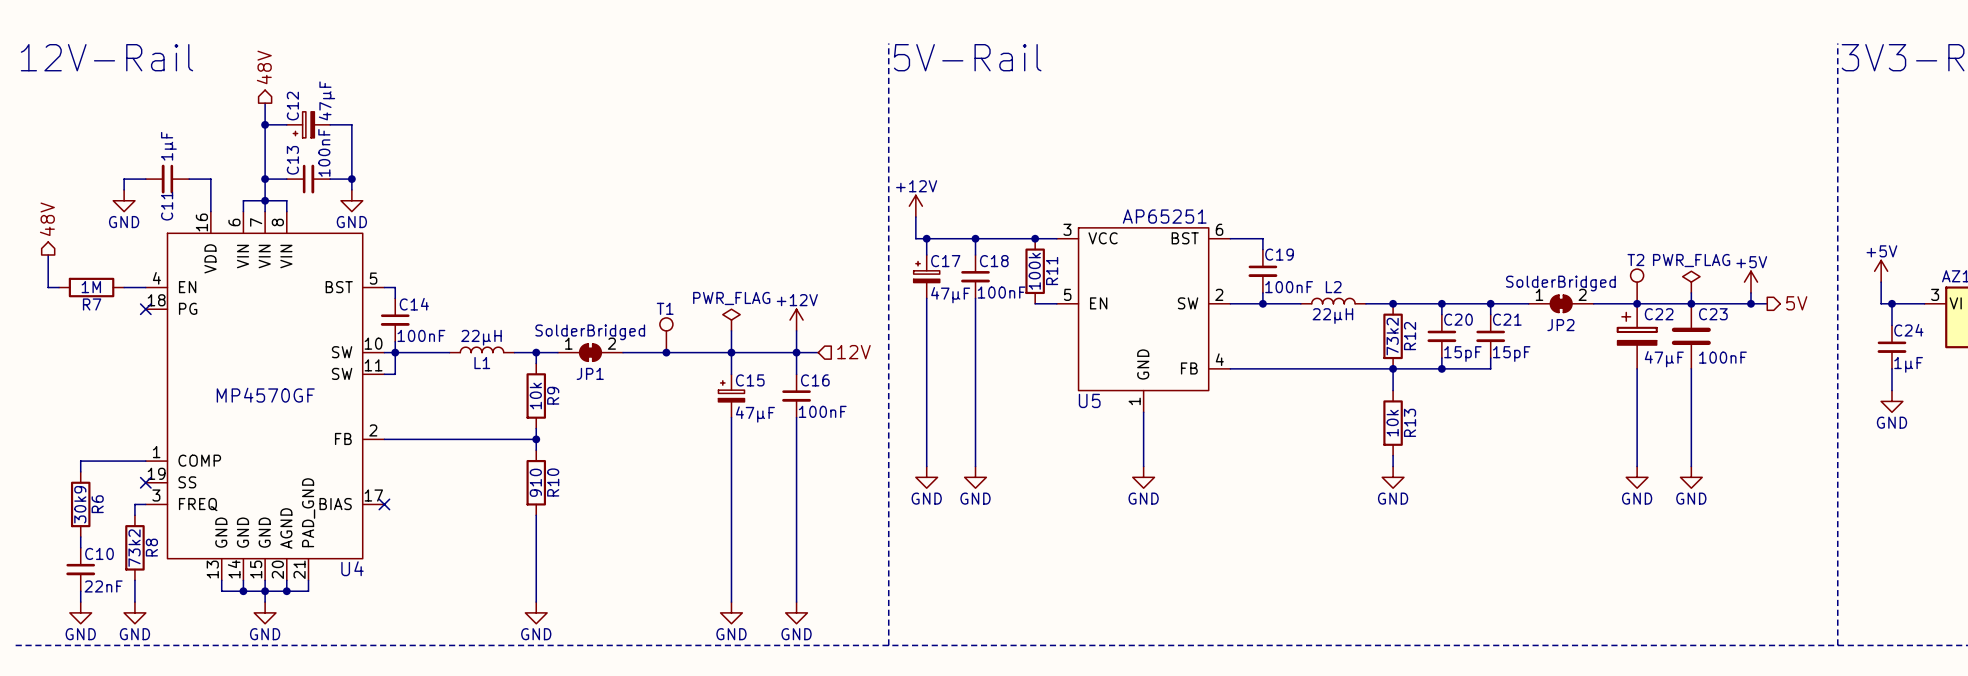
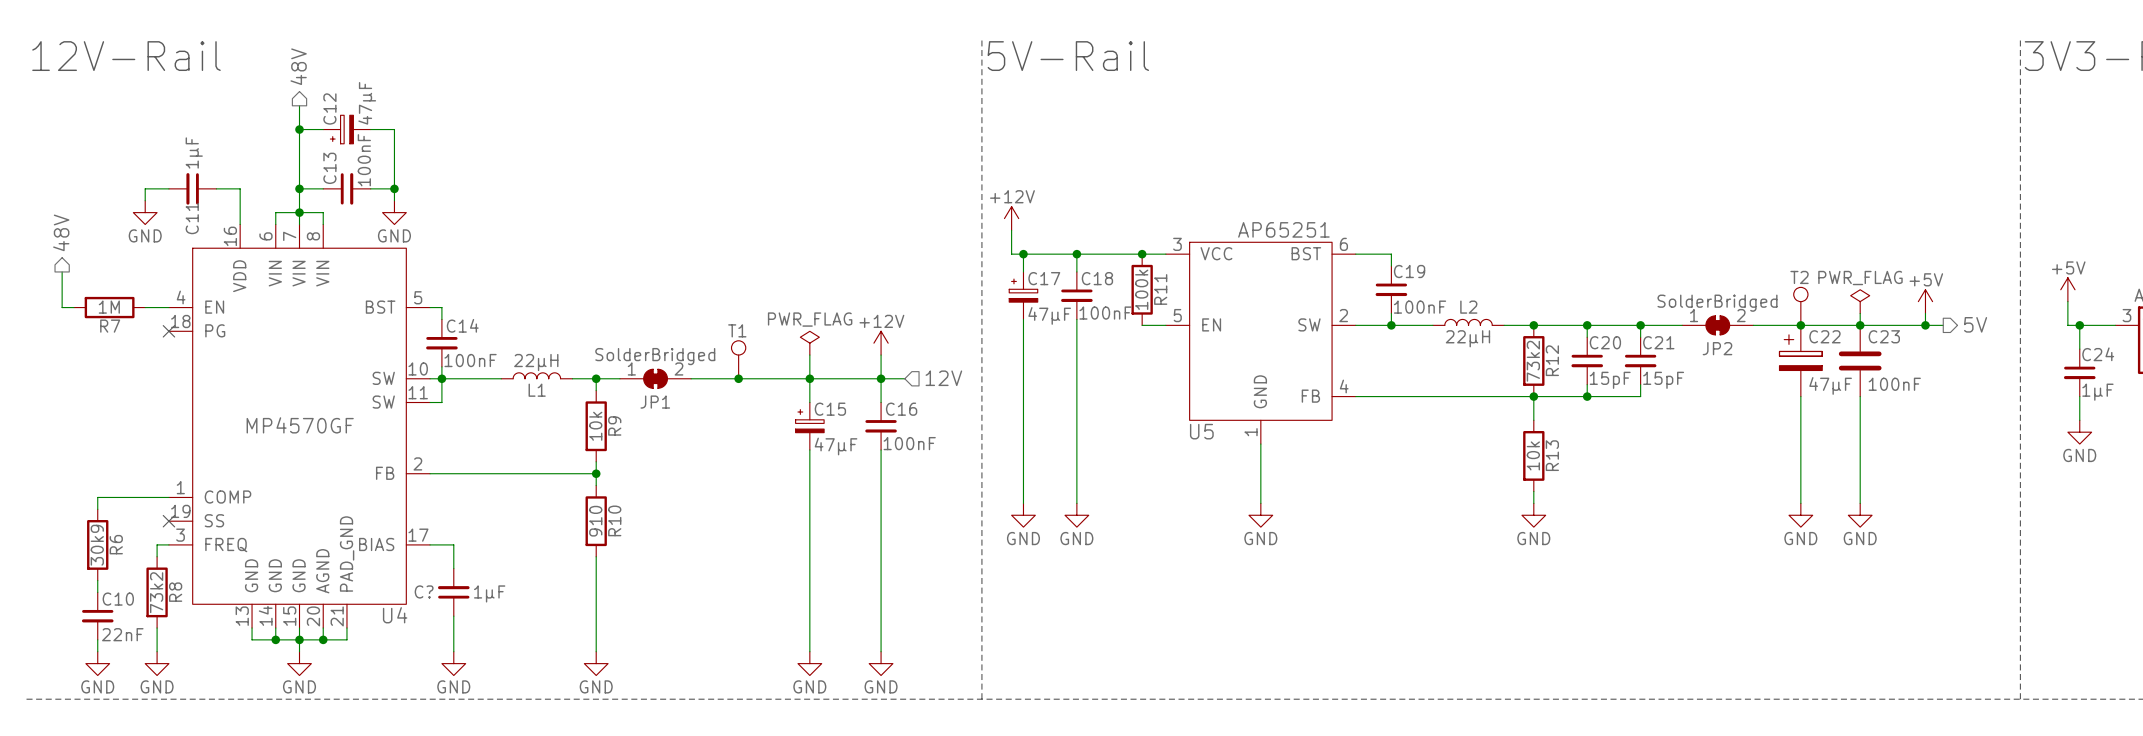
wire: none -> (430, 544) (453, 544) (453, 568)
no-connect mark: (384, 504) -> none
C?: none -> 1μF (453, 592)
wire: none -> (453, 616) (453, 651)
power symbol: none -> GND (453, 663)

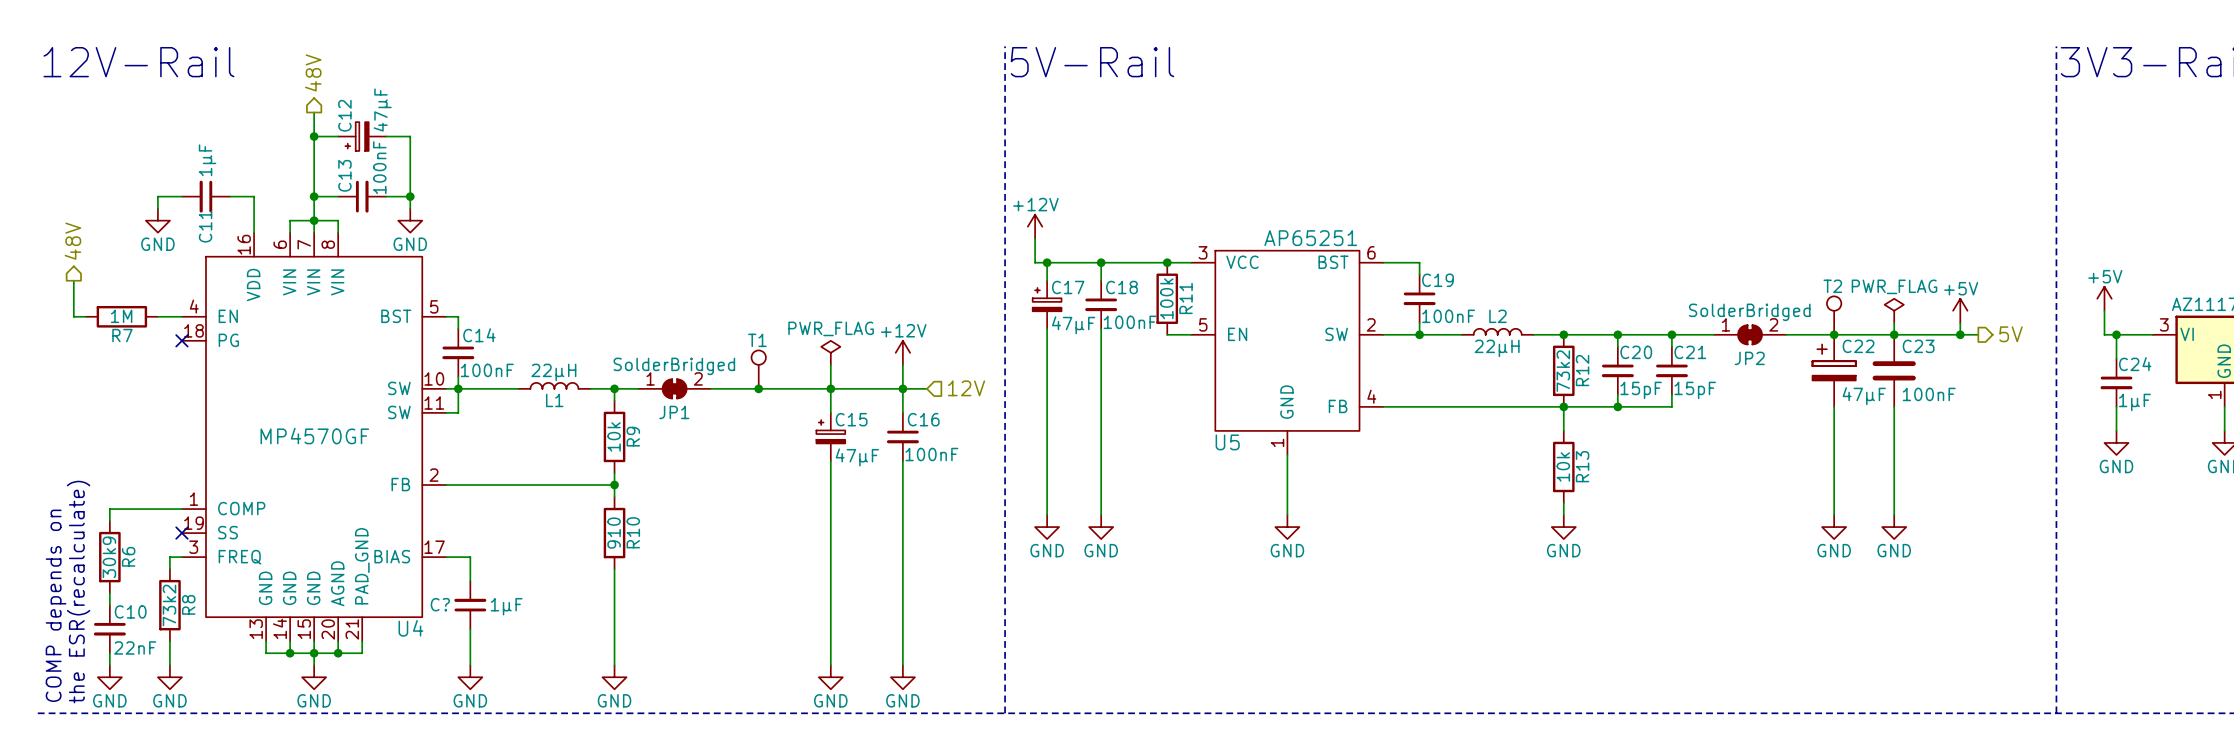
text: none -> the ESR(recalculate) (78, 592)
text: none -> COMP depends on (56, 605)

